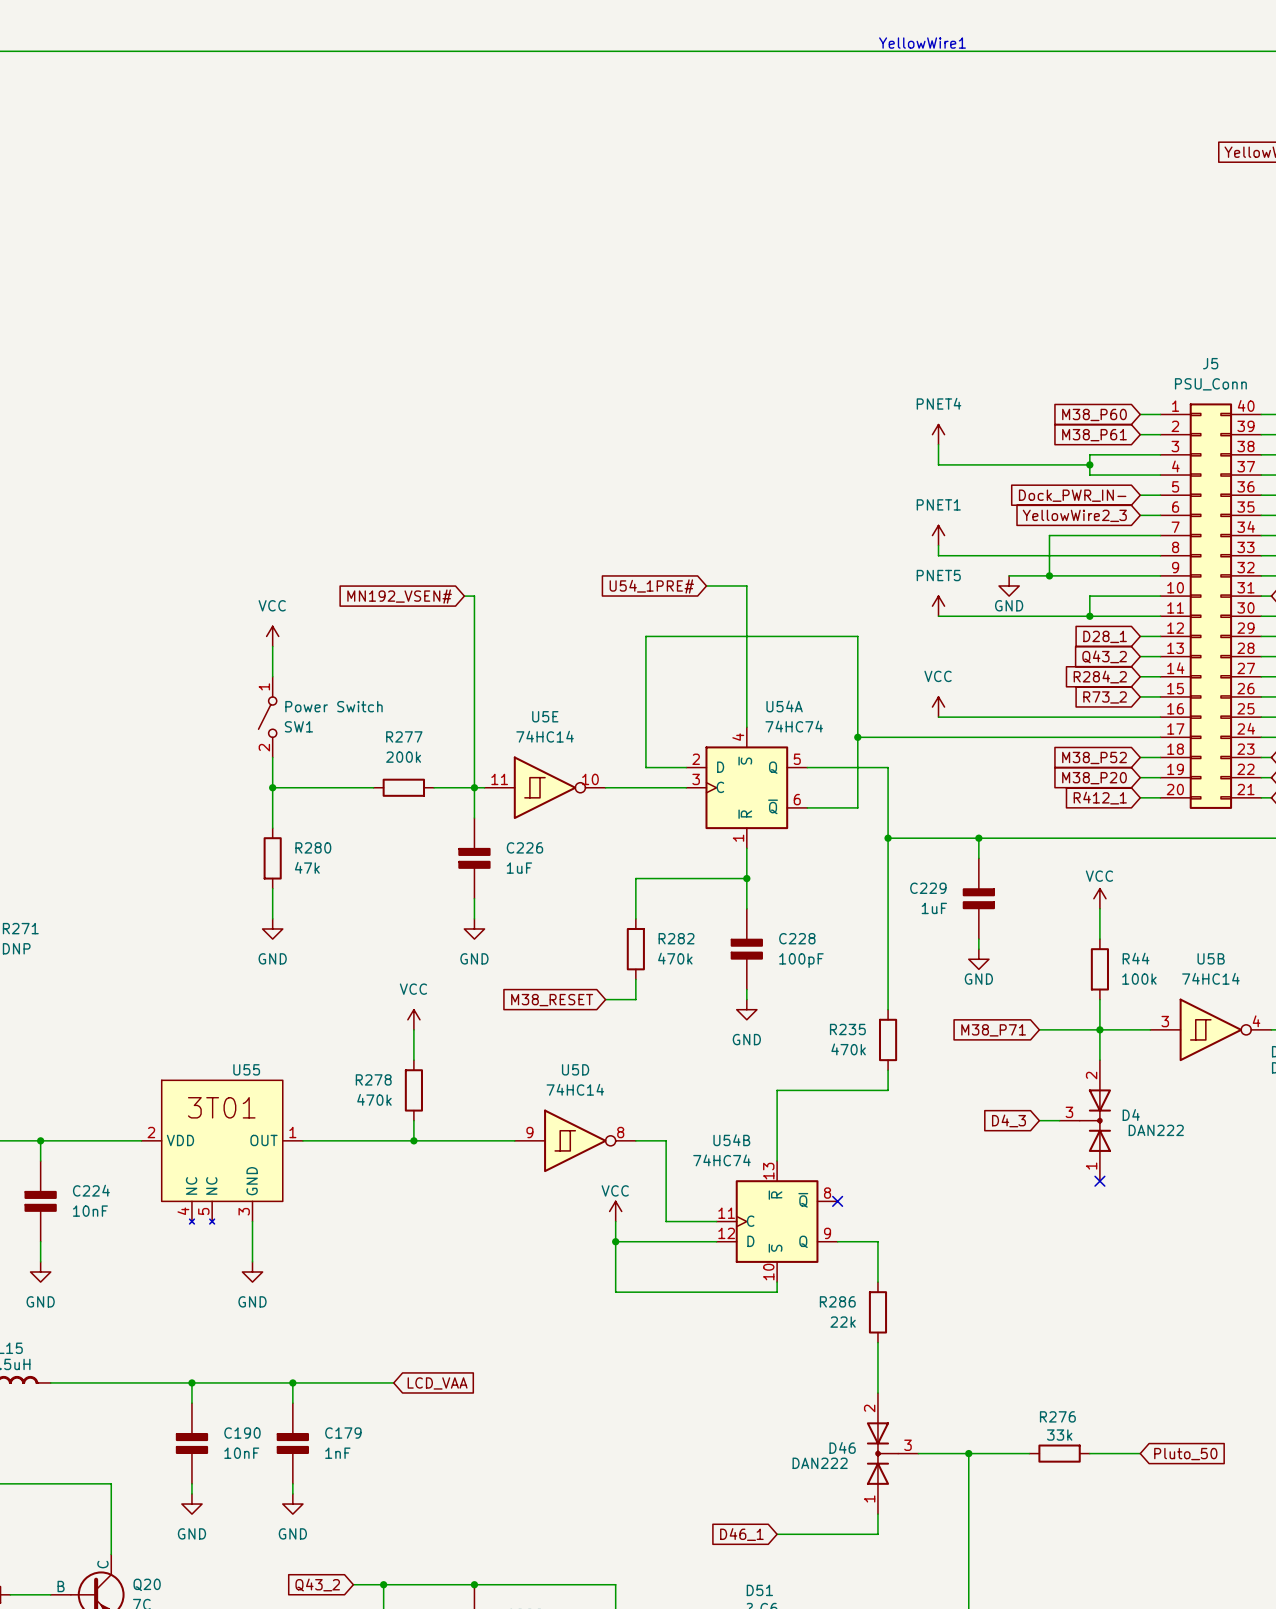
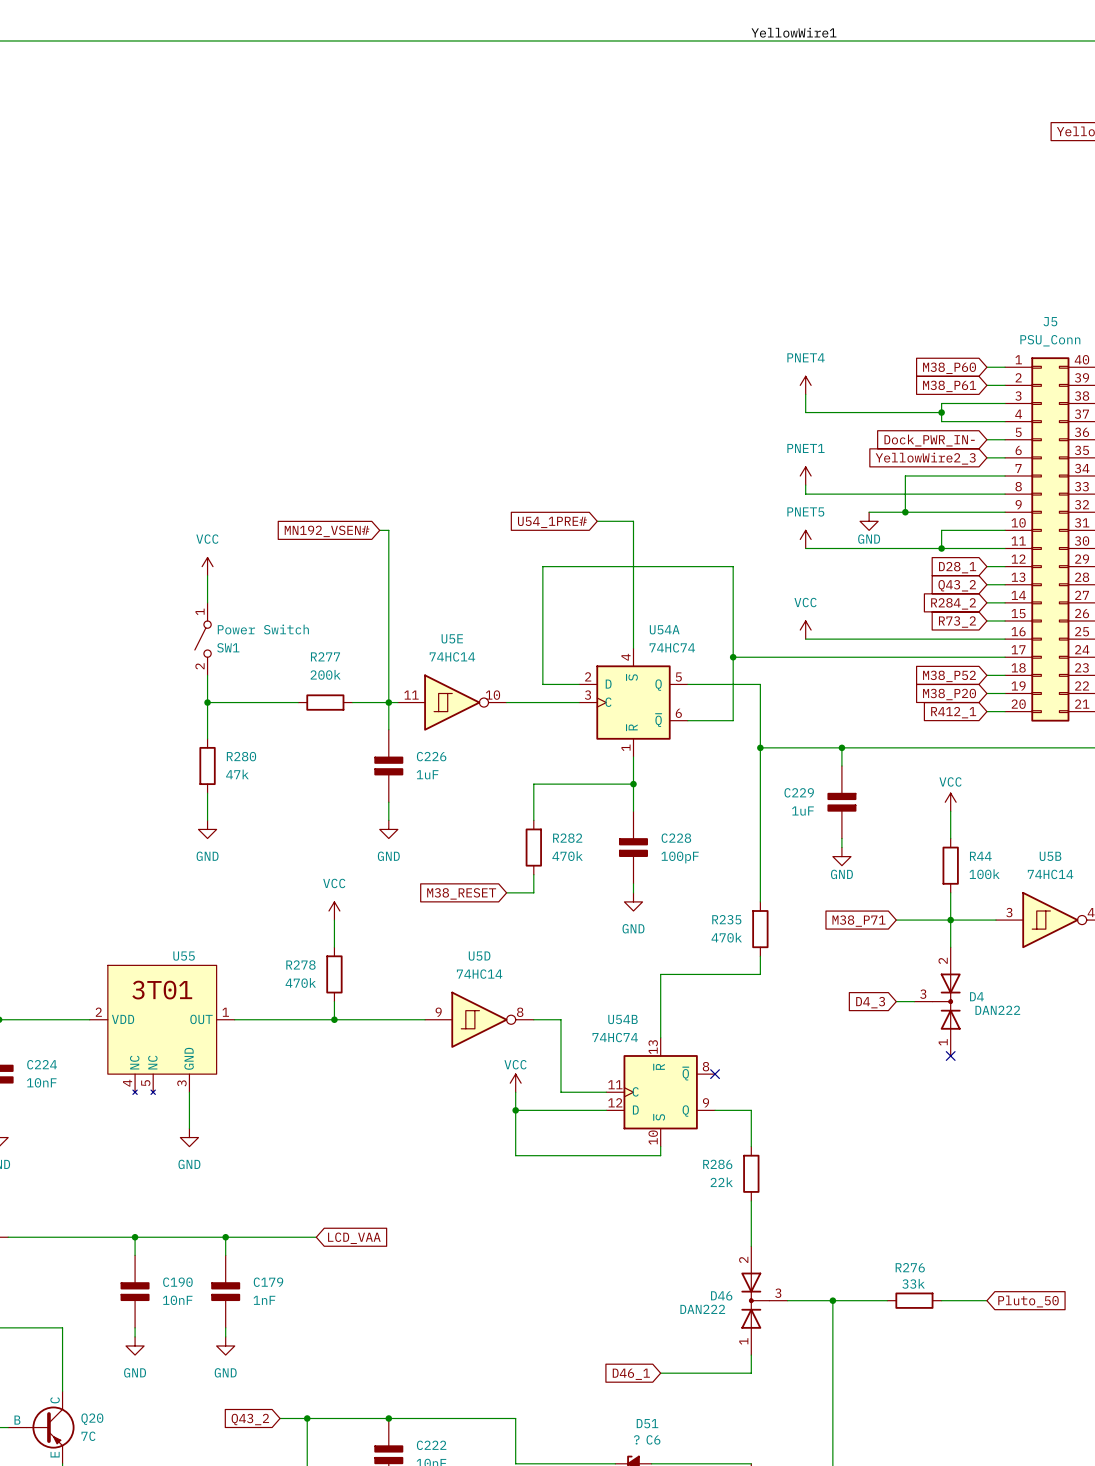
label: none -> YellowWire1 (793, 32)
text: YellowWire1 (922, 43) -> none

